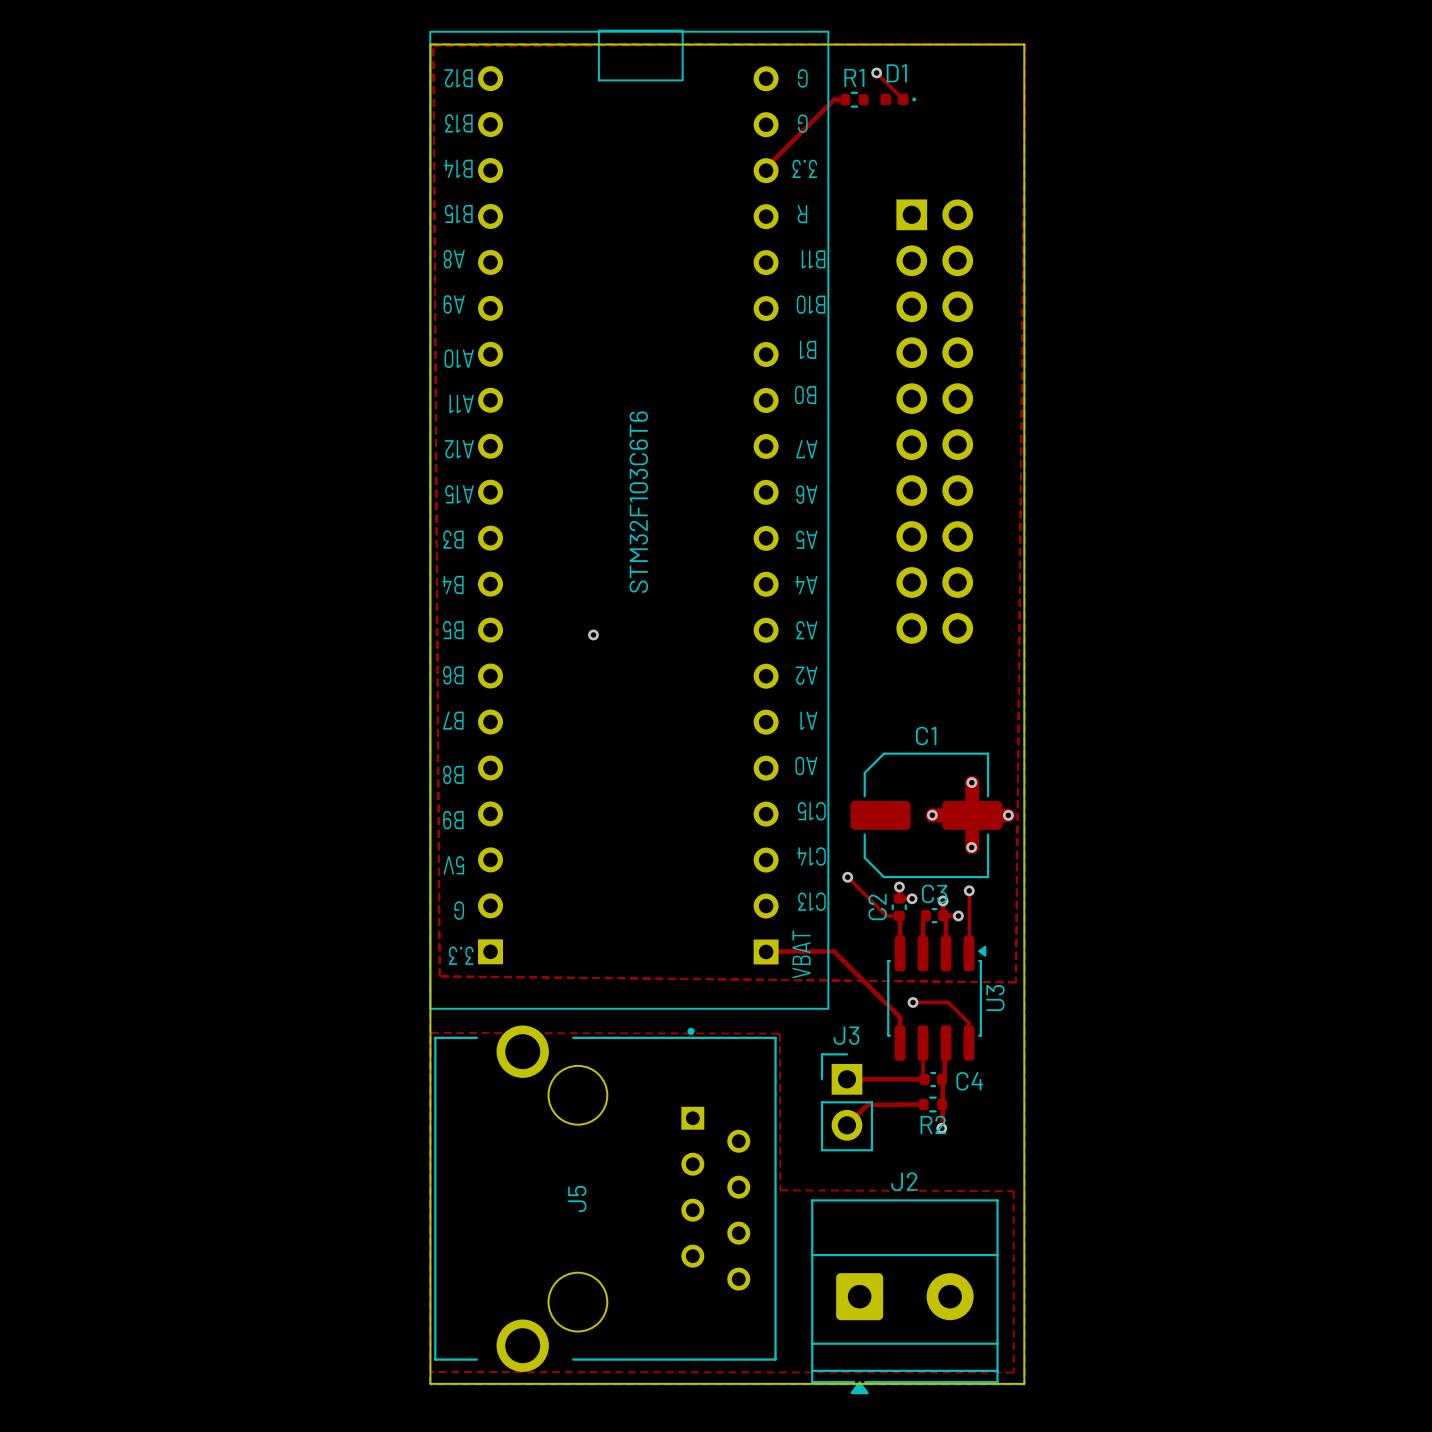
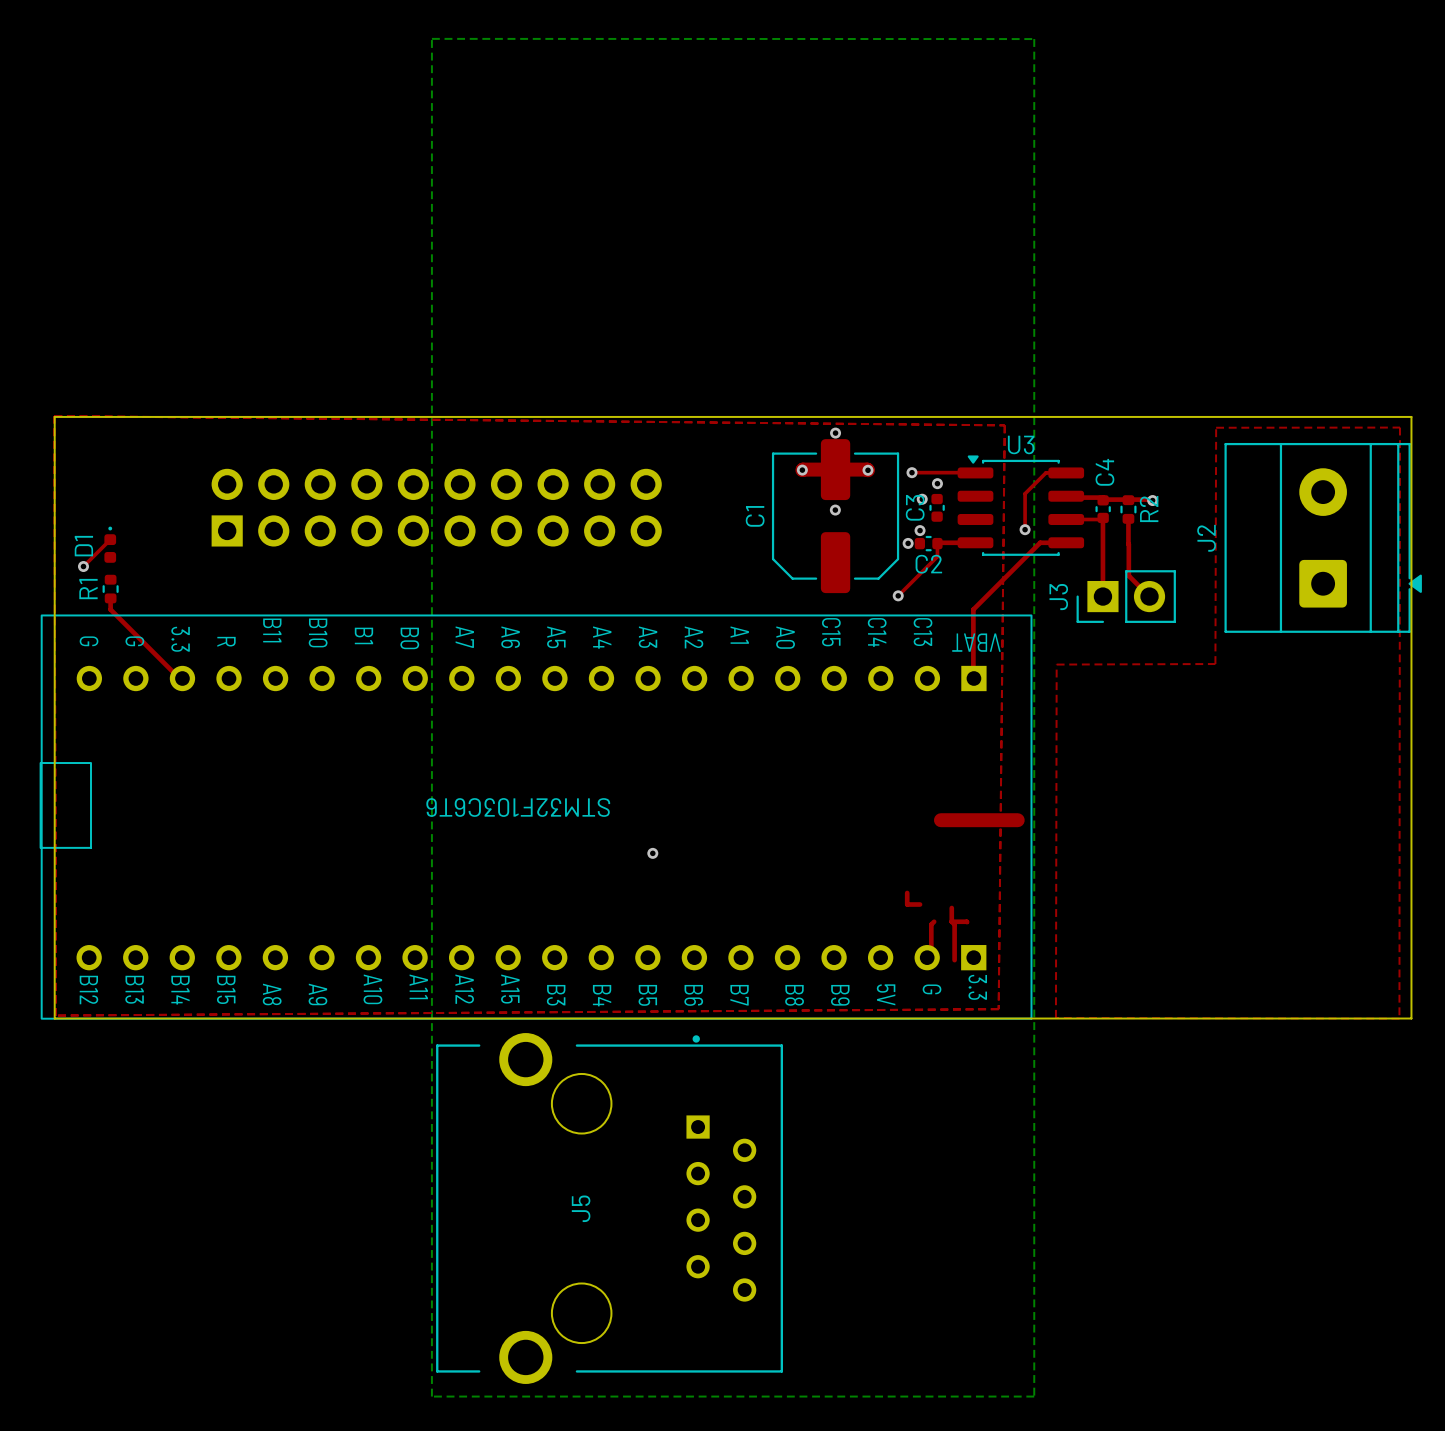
board edge: (430, 44) (1024, 44) (1024, 1383) (430, 1383) (430, 44) -> none
top zone outline: (432, 45) (1025, 44) (1015, 982) (439, 976) (433, 45) -> none
top track: (876, 72) (903, 99) -> none
via: (876, 72) -> none
top track: (845, 99) (834, 99) (763, 170) -> none
R1 rotation: 0° (854, 99) -> 90° clockwise (110, 589)
R1 position: (854, 99) -> (110, 589)
D1 rotation: 0° (898, 99) -> 90° counterclockwise (110, 544)
D1 position: (898, 99) -> (110, 544)
board edge: none -> (54, 416) (1411, 416) (1411, 1018) (54, 1018) (54, 416)
part: (934, 421) -> none
via: none -> (835, 433)
top track: none -> (802, 470) (867, 470)
via: none -> (802, 470)
via: none -> (867, 470)
top track: none -> (911, 472) (975, 472)
via: none -> (911, 472)
top track: none -> (1066, 472) (1045, 472) (1025, 493) (1025, 529)
via: none -> (937, 483)
top track: none -> (1066, 496) (1152, 500)
via: none -> (922, 499)
via: none -> (1152, 500)
part: none -> (436, 507)
via: none -> (835, 510)
top track: none -> (1128, 518) (1128, 575) (1149, 596)
top track: none -> (1066, 519) (1099, 519) (1103, 515) (1102, 596)
STM32F103C6T6 rotation: 0° (629, 519) -> 90° counterclockwise (536, 817)
via: none -> (1025, 529)
via: none -> (920, 530)
top track: none -> (110, 539) (83, 566)
top track: none -> (975, 542) (938, 542) (937, 556) (898, 595)
top track: none -> (1066, 542) (1040, 542) (973, 609) (973, 680)
via: none -> (908, 543)
via: none -> (83, 566)
via: none -> (898, 595)
top track: none -> (110, 597) (110, 609) (181, 680)
via: (593, 634) -> none
top track: (971, 782) (971, 847) -> none
via: (971, 782) -> none
C1 rotation: 0° (926, 815) -> 90° counterclockwise (835, 516)
C1 position: (926, 815) -> (835, 516)
via: (932, 815) -> none
via: (1008, 815) -> none
via: (971, 847) -> none
via: none -> (652, 853)
top track: (847, 877) (886, 915) (900, 916) (900, 953) -> none
via: (847, 877) -> none
via: (899, 887) -> none
top track: (969, 890) (969, 953) -> none
via: (969, 890) -> none
via: (912, 898) -> none
via: (943, 900) -> none
C2 rotation: 0° (899, 907) -> 90° clockwise (928, 543)
C2 position: (899, 907) -> (928, 543)
C3 rotation: 0° (934, 915) -> 90° clockwise (937, 507)
C3 position: (934, 915) -> (937, 507)
via: (958, 915) -> none
top track: (763, 951) (834, 951) (900, 1017) (900, 1043) -> none
U3 rotation: 0° (936, 998) -> 90° counterclockwise (1020, 505)
U3 position: (936, 998) -> (1020, 505)
top track: (913, 1002) (948, 1002) (969, 1022) (969, 1043) -> none
via: (913, 1002) -> none
top zone outline: none -> (55, 1015) (998, 1009) (1004, 425) (54, 416) (55, 1015)
top zone outline: none -> (1055, 1017) (1055, 1017) (1399, 1018) (1399, 427) (1216, 427) (1215, 664) (1056, 664) (1055, 1017)
top zone outline: (431, 1032) (430, 1372) (1013, 1372) (1013, 1191) (780, 1190) (779, 1033) (431, 1032) -> none
top track: (923, 1043) (923, 1075) (927, 1080) (846, 1079) -> none
top track: (946, 1043) (941, 1128) -> none
C4 rotation: 0° (933, 1079) -> 90° clockwise (1103, 509)
C4 position: (933, 1079) -> (1103, 509)
C4 name position: C4 (969, 1081) -> C4 (1104, 472)
J3 rotation: 0° (846, 1102) -> 90° counterclockwise (1126, 596)
J3 position: (846, 1102) -> (1126, 596)
top track: (924, 1104) (867, 1104) (846, 1125) -> none
R2 rotation: 0° (932, 1104) -> 90° clockwise (1128, 509)
R2 position: (932, 1104) -> (1128, 509)
via: (941, 1128) -> none
J2 rotation: 0° (904, 1296) -> 90° counterclockwise (1323, 537)
J2 position: (904, 1296) -> (1323, 537)

